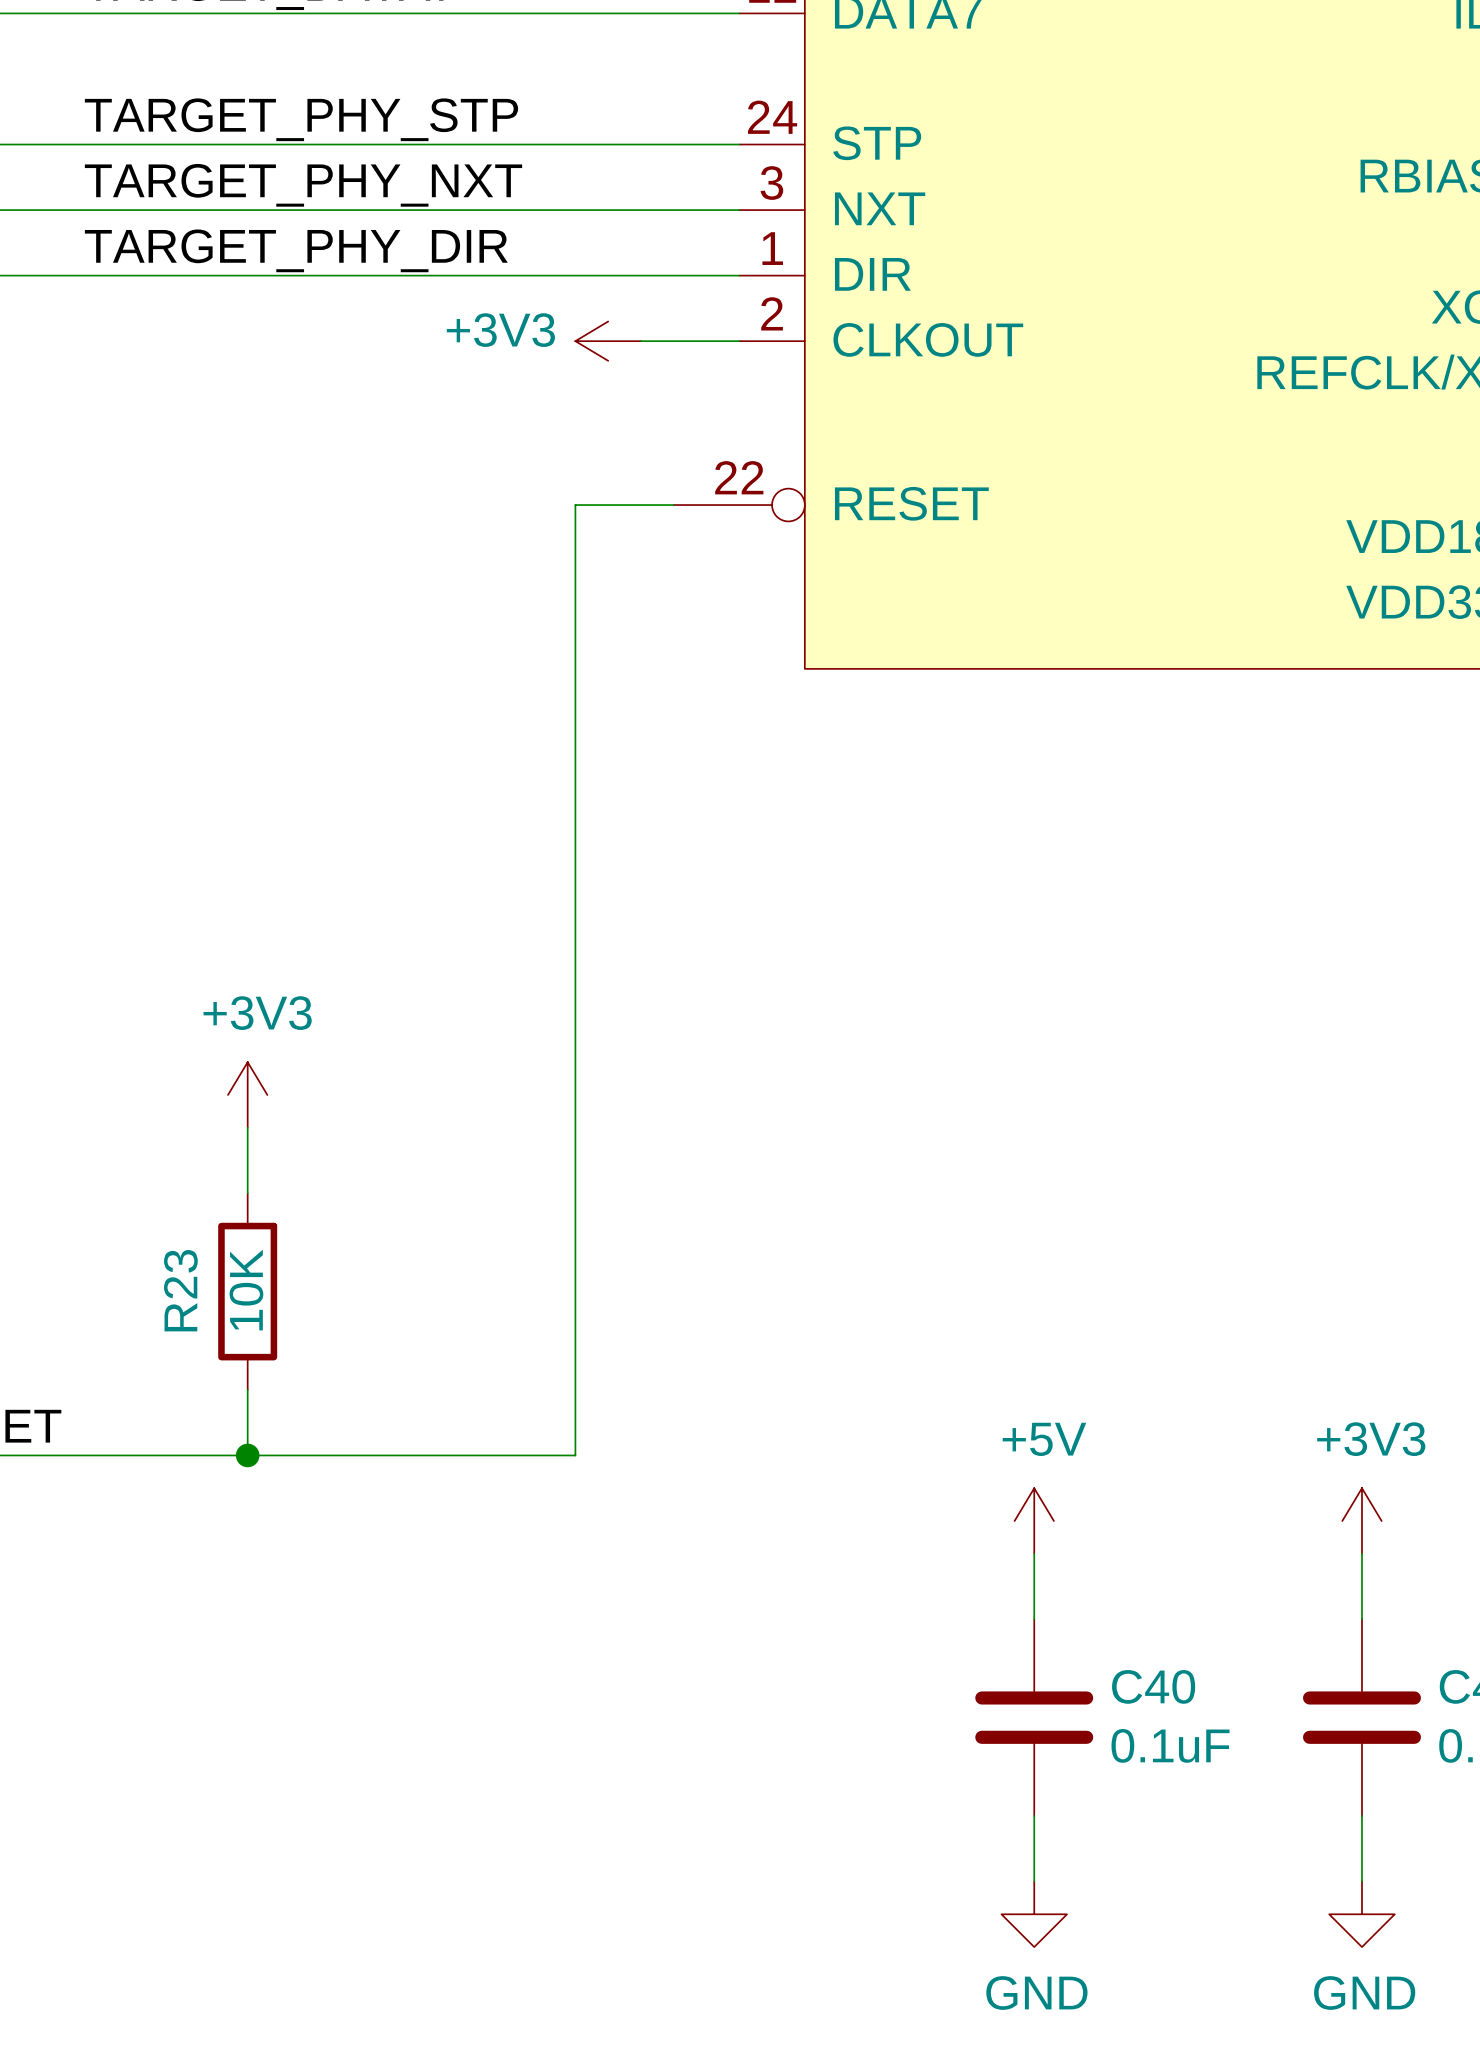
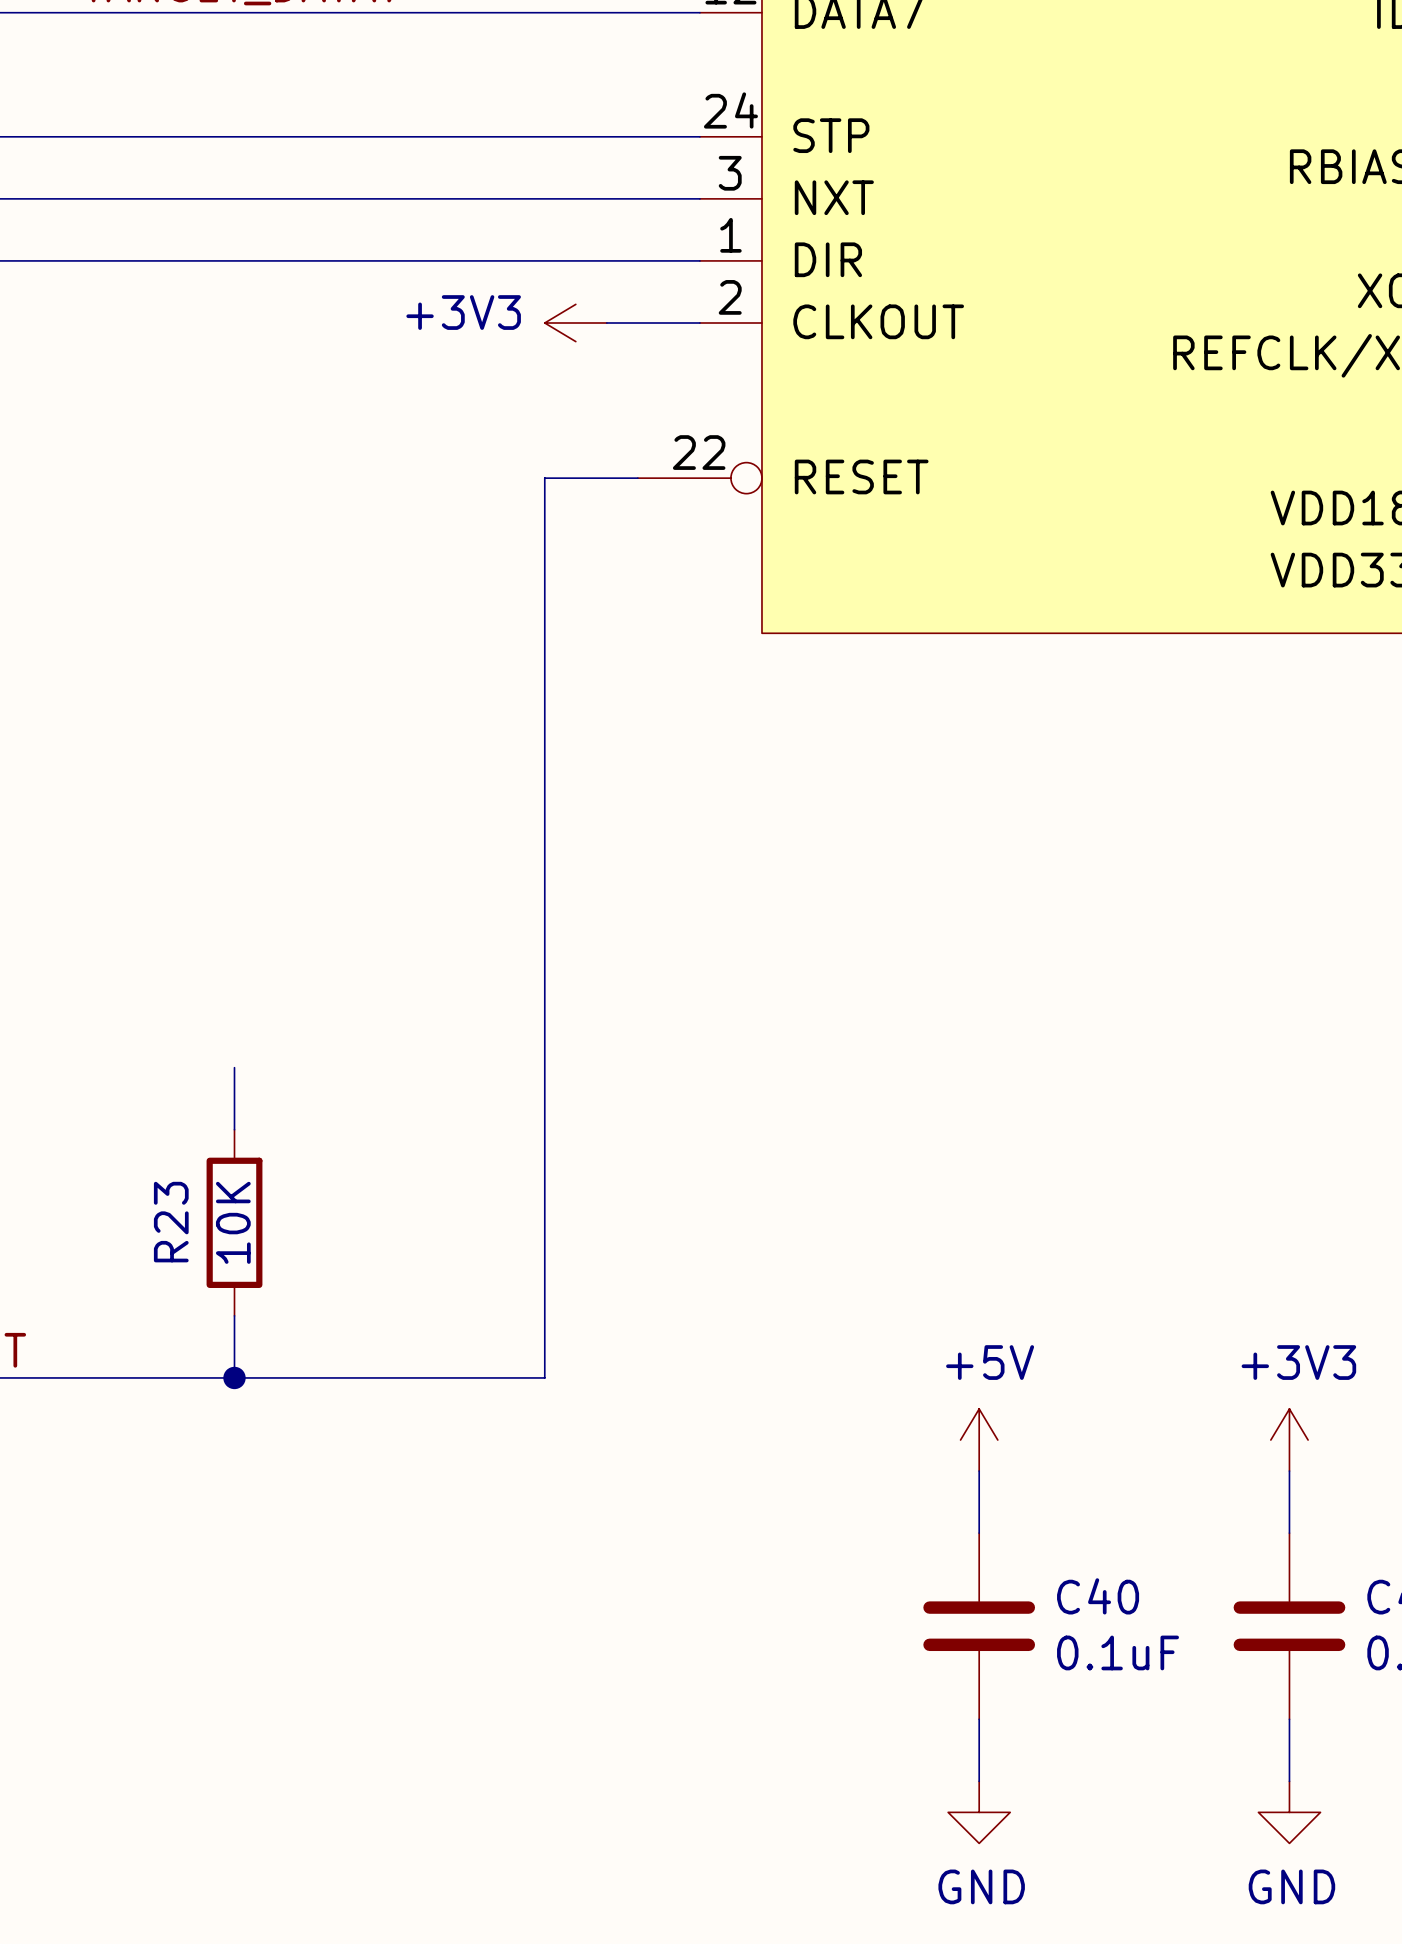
label: TARGET_PHY_STP (301, 119) -> none
label: TARGET_PHY_NXT (303, 185) -> none
label: TARGET_PHY_DIR (296, 250) -> none
power symbol: +3V3 (247, 1094) -> none

